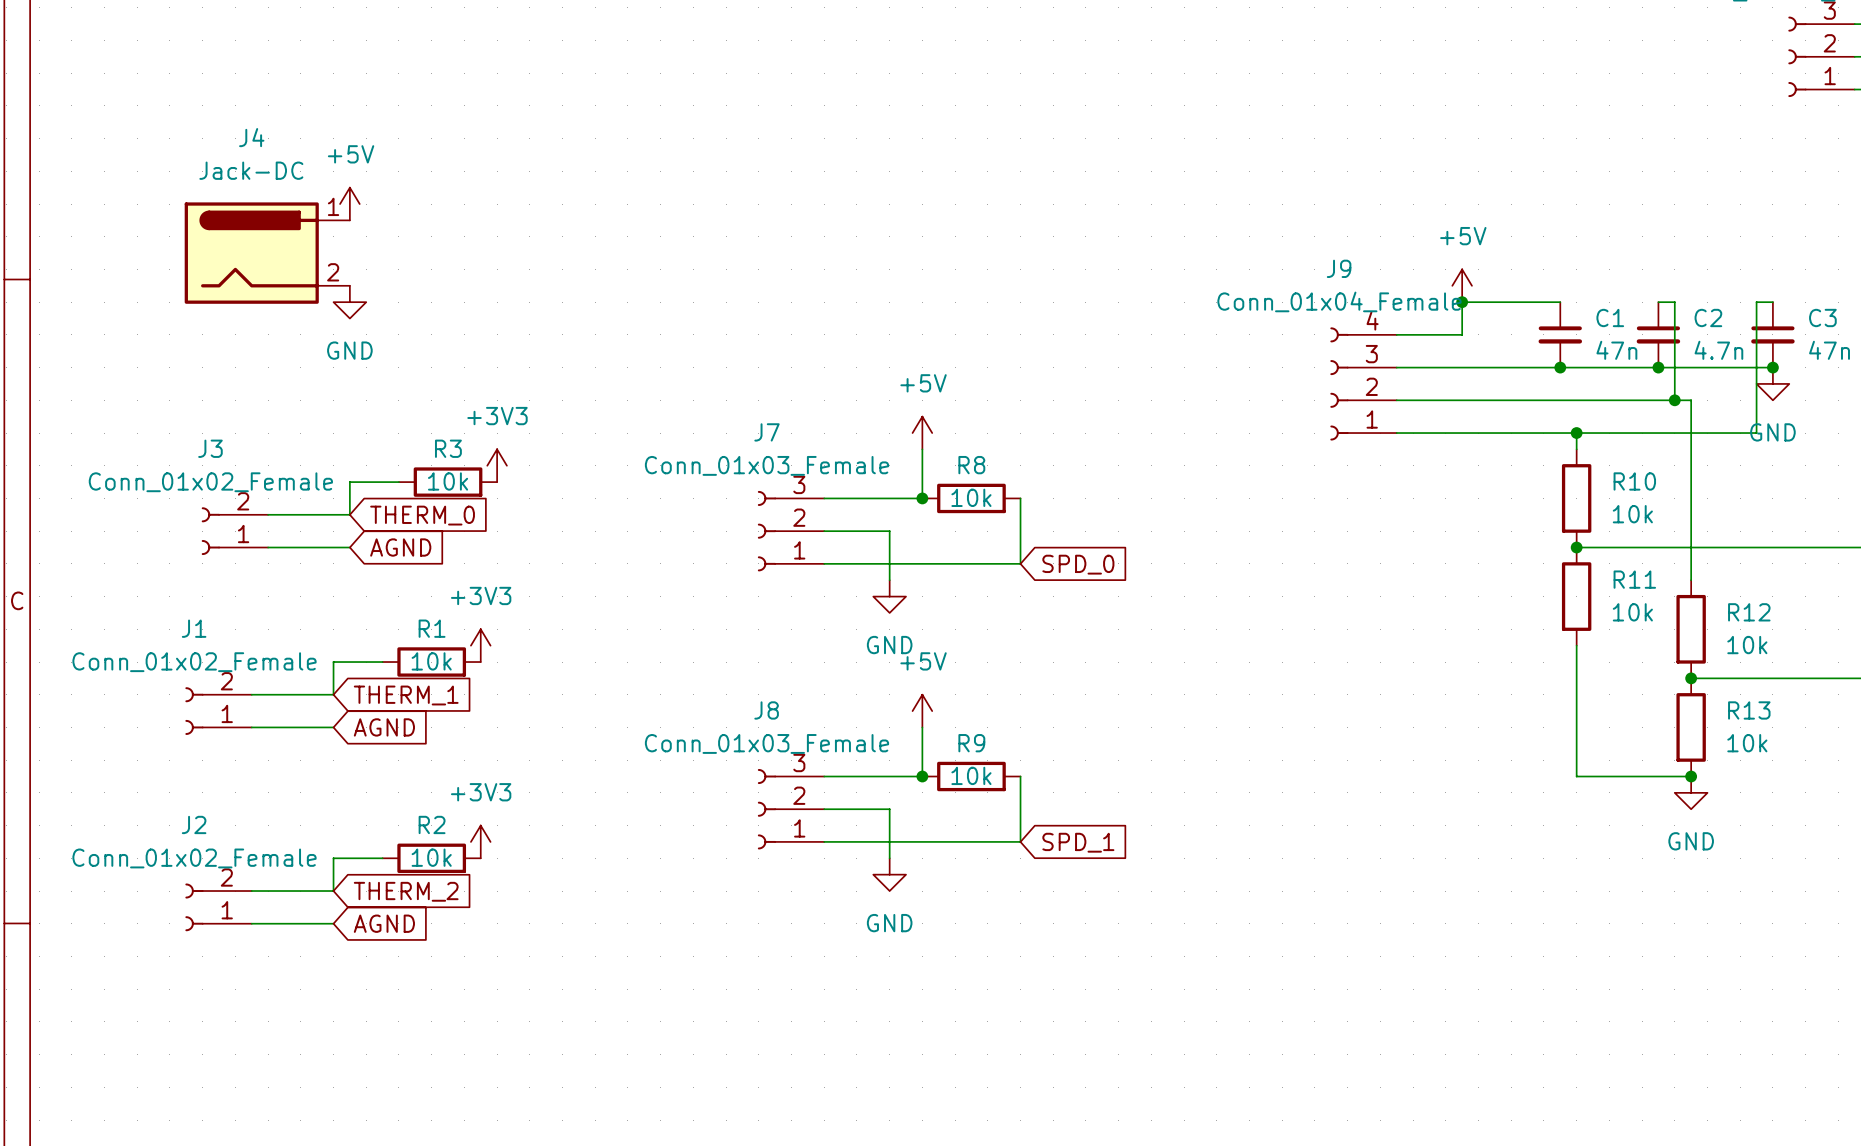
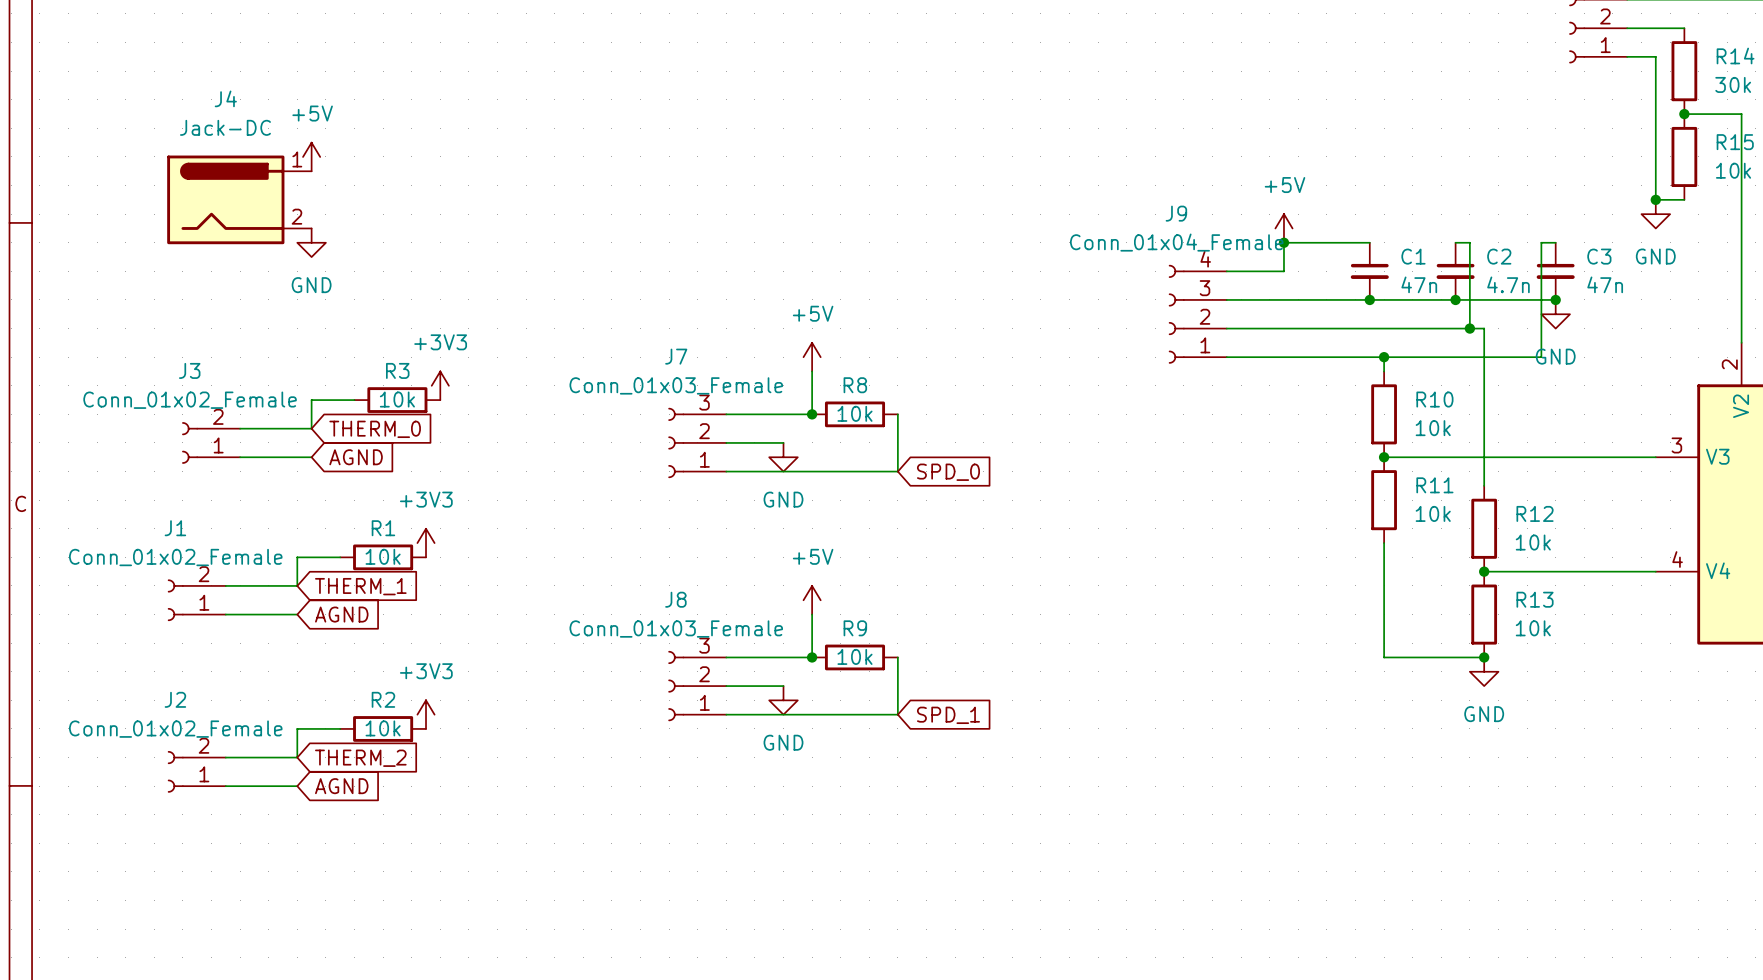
wire: (889, 531) (889, 580) -> none
power symbol position: GND (889, 596) -> GND (783, 457)
wire: (889, 809) (889, 858) -> none
power symbol position: GND (889, 874) -> GND (783, 700)

